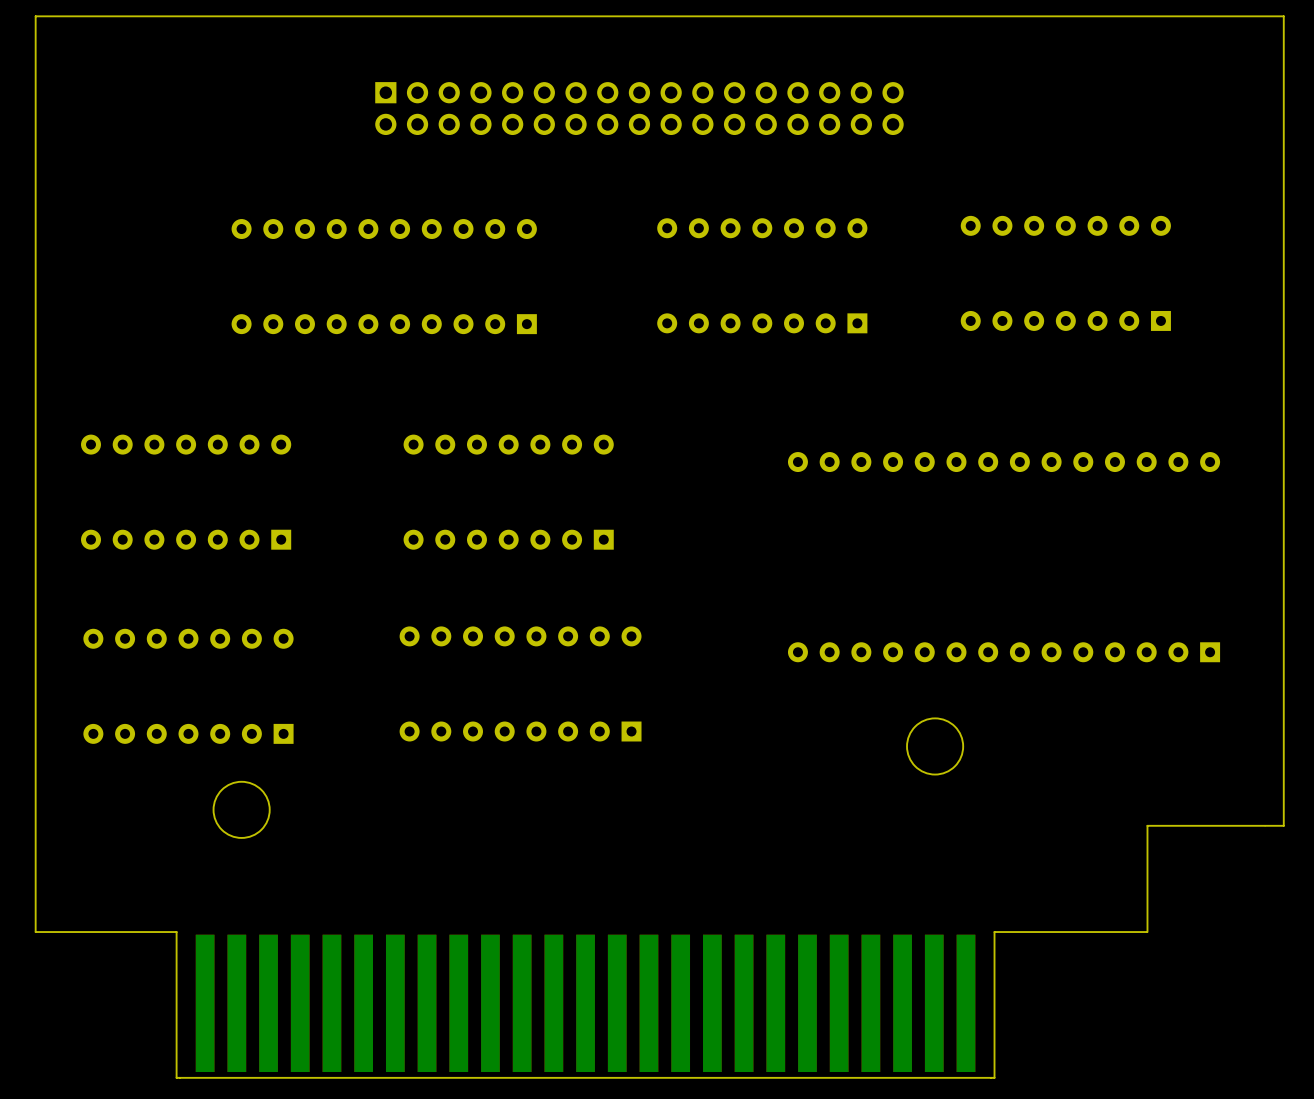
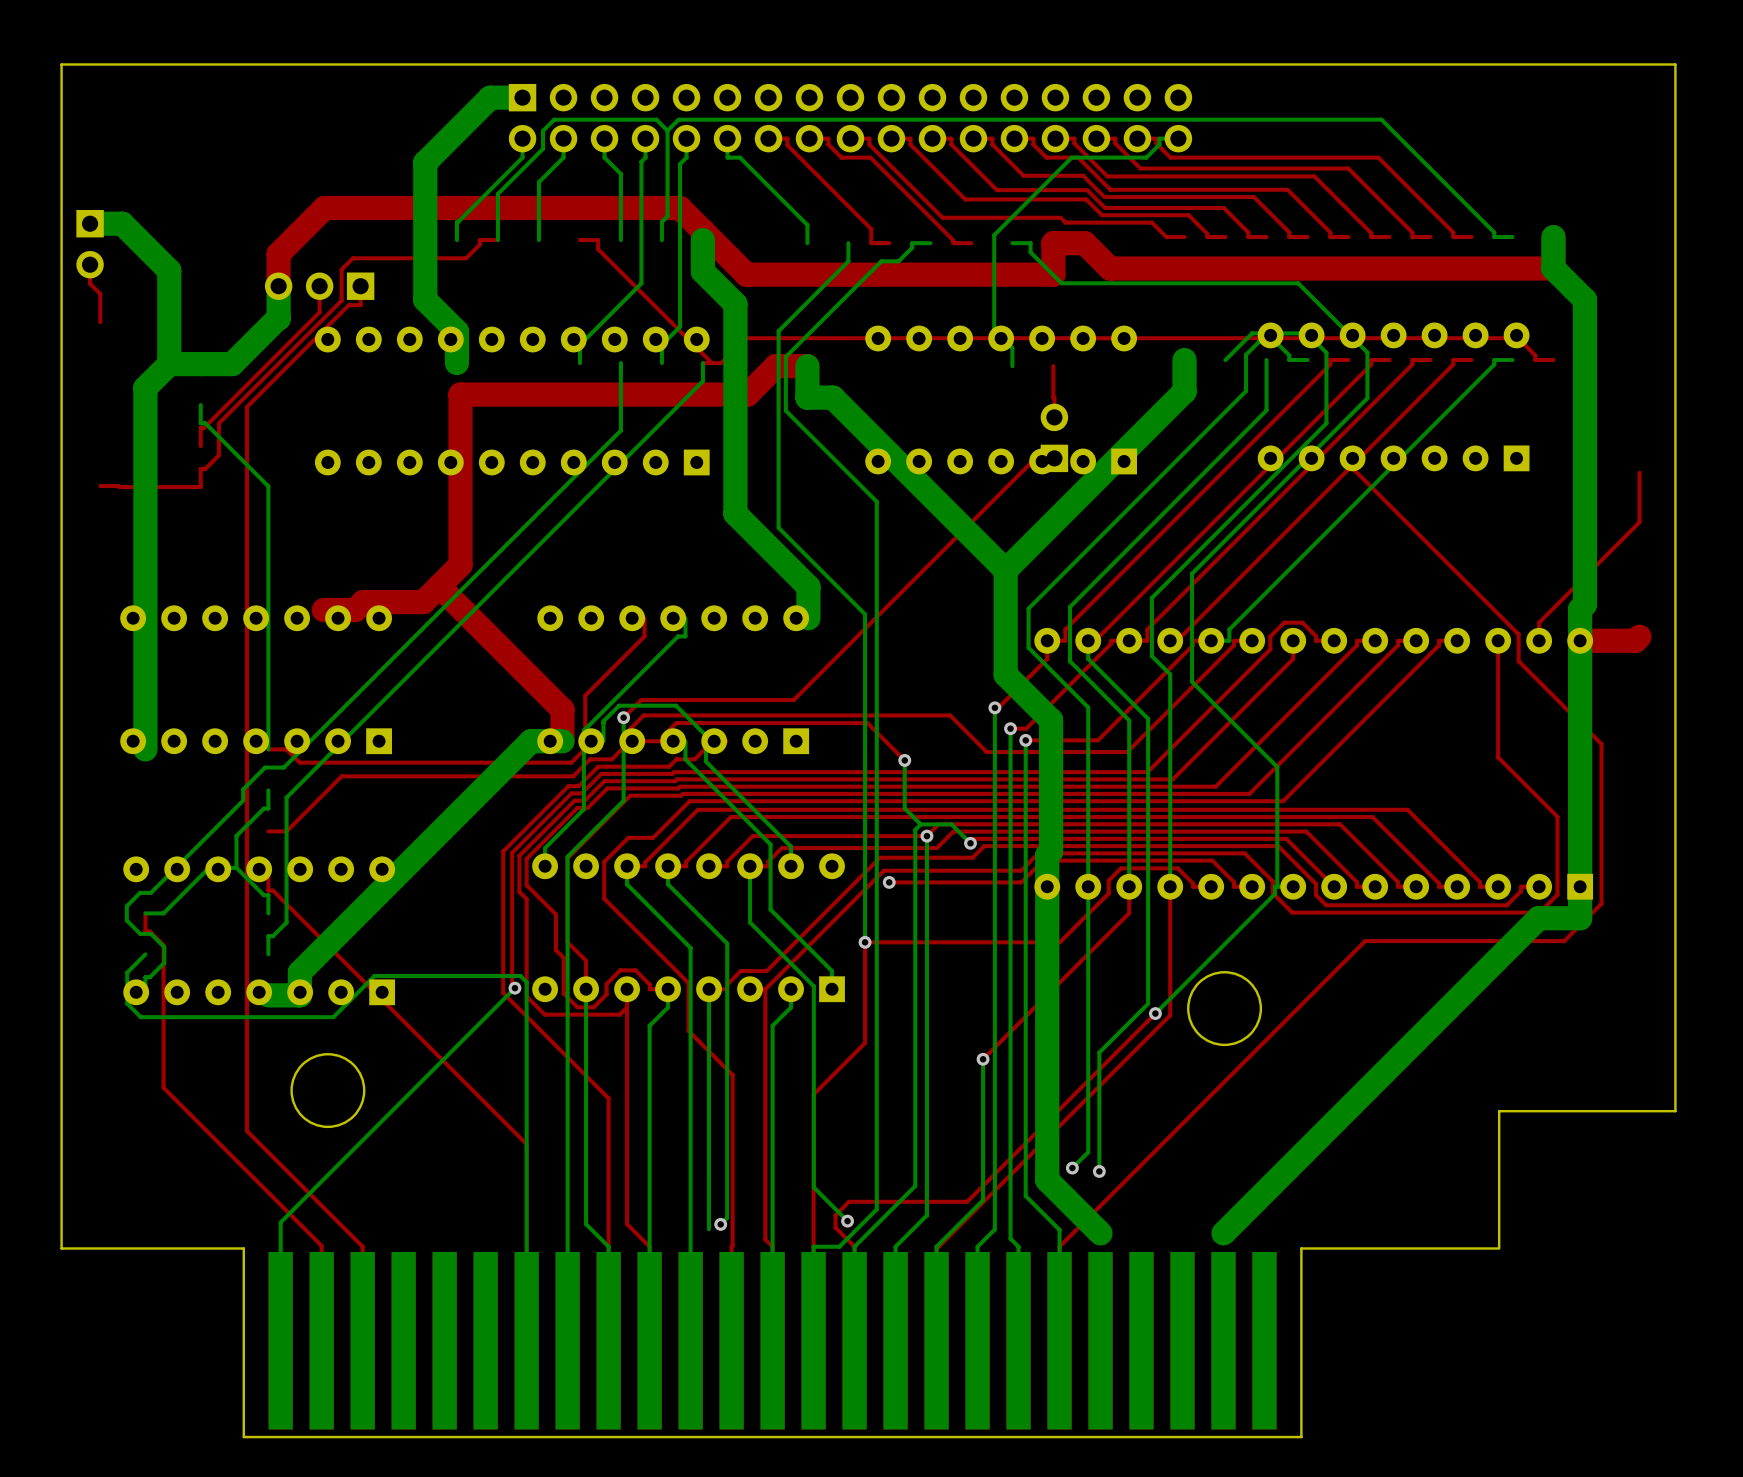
bottom track: none -> (522, 97) (490, 97) (425, 162) (425, 299) (456, 331) (456, 363)
bottom track: none -> (667, 130) (667, 216) (661, 221) (661, 240)
bottom track: none -> (667, 130) (678, 119) (1381, 119) (1494, 232) (1494, 237) (1512, 237)
bottom track: none -> (667, 130) (656, 119) (554, 119) (543, 130) (543, 148) (497, 193) (497, 240)
bottom track: none -> (522, 138) (522, 157) (456, 221) (456, 240)
bottom track: none -> (563, 138) (563, 157) (538, 182) (538, 240)
bottom track: none -> (604, 138) (604, 157) (620, 174) (620, 240)
bottom track: none -> (645, 138) (645, 157) (641, 161) (641, 283) (579, 344) (579, 363)
bottom track: none -> (686, 138) (686, 157) (680, 164) (680, 326) (661, 344) (661, 363)
bottom track: none -> (727, 138) (727, 157) (740, 157) (807, 225) (807, 243)
top track: none -> (768, 138) (787, 138) (787, 145) (871, 229) (871, 243) (889, 243)
top track: none -> (809, 138) (828, 138) (828, 144) (841, 157) (870, 157) (953, 240) (953, 243) (971, 243)
top track: none -> (850, 138) (869, 138) (869, 144) (942, 217) (1060, 217) (1065, 222) (1151, 222) (1166, 237) (1184, 237)
top track: none -> (891, 138) (910, 138) (910, 144) (965, 199) (1086, 199) (1102, 215) (1188, 215) (1207, 233) (1207, 237) (1225, 237)
top track: none -> (932, 138) (951, 138) (951, 144) (997, 190) (1087, 190) (1105, 207) (1223, 207) (1248, 232) (1248, 237) (1266, 237)
top track: none -> (973, 138) (992, 138) (992, 144) (1023, 175) (1083, 175) (1104, 197) (1253, 197) (1289, 232) (1289, 237) (1307, 237)
top track: none -> (1014, 138) (1033, 138) (1033, 144) (1046, 157) (1078, 157) (1110, 189) (1287, 189) (1330, 232) (1330, 237) (1348, 237)
top track: none -> (1055, 138) (1074, 138) (1074, 143) (1107, 176) (1314, 176) (1371, 233) (1371, 237) (1389, 237)
top track: none -> (1096, 138) (1115, 138) (1115, 143) (1140, 168) (1348, 168) (1412, 232) (1412, 237) (1430, 237)
top track: none -> (1137, 138) (1156, 138) (1156, 143) (1170, 157) (1378, 157) (1453, 232) (1453, 237) (1471, 237)
bottom track: none -> (1178, 138) (1159, 138) (1159, 144) (1146, 157) (1071, 157) (994, 235) (994, 329) (1012, 347) (1012, 366)
part position: (639, 108) -> (850, 118)
bottom track: none -> (90, 223) (122, 223) (169, 270) (169, 364)
bottom track: none -> (1553, 237) (1553, 268) (1584, 299) (1584, 604) (1580, 609) (1580, 918) (1538, 918) (1223, 1233)
top track: none -> (1553, 237) (1553, 268) (1110, 268) (1084, 243) (1053, 243) (1053, 274) (746, 274) (679, 208) (324, 208) (278, 253) (278, 286)
top track: none -> (497, 240) (479, 240) (479, 244) (466, 258) (352, 258) (341, 269) (341, 300) (218, 423) (218, 455) (205, 468) (200, 468) (200, 487) (100, 486)
top track: none -> (579, 240) (598, 240) (598, 249) (711, 363)
bottom track: none -> (702, 240) (702, 271) (735, 304) (735, 513) (808, 586) (808, 618)
bottom track: none -> (848, 243) (848, 261) (778, 331) (778, 527) (865, 614) (865, 942)
bottom track: none -> (930, 243) (912, 243) (912, 247) (898, 261) (881, 261) (785, 356) (785, 410) (876, 501) (876, 1209) (839, 1246) (813, 1246) (813, 1340)
bottom track: none -> (1012, 243) (1030, 243) (1030, 252) (1061, 283) (1298, 283) (1367, 352) (1367, 398) (1192, 573) (1192, 681) (1277, 767) (1277, 886)
part: none -> (90, 244)
top track: none -> (90, 264) (90, 283) (100, 293) (100, 322)
bottom track: none -> (278, 286) (278, 318) (232, 364) (169, 364)
top track: none -> (319, 286) (319, 312) (204, 427) (200, 427) (200, 446)
part: none -> (319, 286)
top track: none -> (360, 286) (360, 305) (348, 305) (246, 406) (246, 1131) (362, 1246) (362, 1340)
bottom track: none -> (1184, 360) (1184, 391) (1005, 570)
bottom track: none -> (1225, 360) (1252, 333) (1307, 333) (1326, 352) (1326, 423) (1151, 597) (1151, 656) (1170, 674) (1170, 886)
bottom track: none -> (1266, 360) (1266, 410) (1070, 606) (1070, 661) (1129, 720) (1129, 886)
bottom track: none -> (1307, 360) (1289, 360) (1289, 355) (1275, 341) (1259, 341) (1246, 354) (1246, 391) (1028, 608) (1028, 647) (1088, 707) (1088, 1152) (1072, 1168)
top track: none -> (1348, 360) (1330, 360) (1330, 364) (1065, 629) (1065, 640) (1047, 640) (1047, 658) (998, 707) (994, 707)
top track: none -> (1389, 360) (1371, 360) (1371, 364) (1095, 640) (1088, 640)
top track: none -> (1430, 360) (1412, 360) (1412, 364) (1147, 629) (1147, 640) (1111, 640) (1111, 643) (1026, 728) (1010, 728)
top track: none -> (1471, 360) (1453, 360) (1453, 364) (1351, 466)
bottom track: none -> (1512, 360) (1494, 360) (1494, 364) (1229, 629) (1229, 640) (1211, 640)
top track: none -> (1553, 360) (1535, 360) (1535, 355) (1518, 338) (745, 338) (721, 363) (702, 363)
bottom track: none -> (620, 363) (620, 430) (283, 767) (265, 767) (243, 789) (243, 800) (150, 892) (140, 892) (126, 906) (126, 920) (140, 933) (151, 933) (164, 947) (164, 962) (149, 977) (145, 977) (145, 995)
bottom track: none -> (702, 363) (702, 381) (286, 797) (286, 922) (272, 936) (268, 936) (268, 954)
bottom track: none -> (169, 364) (145, 387) (145, 749)
bottom track: none -> (807, 366) (807, 397) (832, 397) (1005, 570)
top track: none -> (807, 366) (775, 366) (747, 394) (460, 394) (460, 565) (439, 586)
top track: none -> (1053, 366) (1054, 417)
bottom track: none -> (200, 405) (200, 423) (205, 423) (268, 486) (268, 749)
part: none -> (1054, 437)
top track: none -> (1054, 458) (1035, 458) (793, 700) (641, 700) (623, 717)
top track: none -> (1351, 466) (1177, 640) (1170, 640)
top track: none -> (1351, 466) (1518, 634) (1518, 661) (1601, 744) (1601, 903) (1564, 941) (1365, 941) (1059, 1246) (1059, 1340)
top track: none -> (1639, 472) (1639, 522) (1539, 622) (1539, 640)
bottom track: none -> (1005, 570) (1005, 674) (1051, 720) (1051, 851) (1047, 855) (1047, 1180) (1100, 1233)
top track: none -> (439, 586) (423, 602) (363, 602) (355, 610) (323, 610)
top track: none -> (439, 586) (562, 709) (562, 741)
top track: none -> (644, 618) (644, 636) (585, 695) (585, 748) (571, 762) (299, 762) (286, 749) (268, 749)
bottom track: none -> (685, 618) (685, 636) (678, 636) (583, 730) (583, 809) (545, 848) (545, 866)
top track: none -> (1639, 636) (1635, 640) (1580, 640)
bottom track: none -> (1088, 640) (1088, 658) (1148, 718) (1148, 1003) (1099, 1052) (1099, 1171)
top track: none -> (1211, 640) (1193, 640) (1193, 645) (1098, 740) (1025, 740)
top track: none -> (1252, 640) (1234, 640) (1234, 645) (1127, 752) (986, 752) (950, 715) (643, 715) (624, 735) (624, 747) (611, 759) (590, 759) (573, 776) (341, 776) (286, 831) (268, 831)
top track: none -> (1293, 640) (1293, 658) (1172, 779) (677, 779) (675, 781) (604, 781) (584, 800) (574, 800) (519, 855) (519, 891) (526, 899) (526, 996) (544, 1014) (619, 1014) (627, 1007)
top track: none -> (1334, 640) (1316, 640) (1316, 636) (1302, 622) (1284, 622) (1270, 636) (1270, 649) (1147, 772) (674, 772) (672, 773) (601, 773) (581, 793) (571, 793) (512, 852) (512, 985) (514, 988)
top track: none -> (1375, 640) (1357, 640) (1357, 645) (1215, 786) (680, 786) (678, 788) (607, 788) (587, 807) (577, 807) (526, 858) (526, 885) (555, 914) (555, 950) (563, 957) (563, 993) (577, 1007) (593, 1007) (606, 994) (606, 984) (620, 970) (635, 970) (649, 984) (649, 989) (668, 989)
top track: none -> (1416, 640) (1398, 640) (1398, 645) (1249, 793) (683, 793) (681, 795) (630, 795) (567, 858) (567, 941) (586, 960) (586, 989)
top track: none -> (1457, 640) (1439, 640) (1439, 645) (1283, 801) (689, 801) (653, 837) (628, 837) (604, 861) (604, 898) (688, 983) (688, 1030) (732, 1075) (731, 1340)
top track: none -> (1498, 640) (1498, 757) (1557, 816) (1557, 894) (1539, 912) (1292, 912) (1272, 893) (1272, 881) (1244, 853) (1038, 853) (1021, 870) (883, 870) (765, 989)
bottom track: none -> (994, 707) (994, 1229) (977, 1246) (977, 1340)
via: none -> (994, 707)
bottom track: none -> (623, 717) (623, 800) (567, 856) (567, 1340)
via: none -> (623, 717)
bottom track: none -> (1010, 728) (1010, 1238) (1018, 1246) (1018, 1340)
via: none -> (1010, 728)
bottom track: none -> (562, 741) (531, 741) (299, 972) (299, 995) (268, 995)
bottom track: none -> (603, 741) (603, 721) (619, 705) (676, 705) (705, 735) (705, 761) (791, 846) (791, 866)
top track: none -> (644, 741) (662, 741) (662, 736) (676, 723) (867, 723) (904, 760)
bottom track: none -> (685, 741) (685, 759) (770, 844) (770, 909) (832, 971) (832, 989)
top track: none -> (726, 741) (708, 741) (708, 745) (694, 759) (676, 759) (669, 766) (598, 766) (578, 786) (568, 786) (503, 851) (503, 992) (608, 1098) (608, 1340)
bottom track: none -> (1025, 740) (1025, 1196) (1059, 1229) (1059, 1340)
via: none -> (1025, 740)
bottom track: none -> (904, 760) (904, 808) (920, 824)
via: none -> (904, 760)
bottom track: none -> (268, 790) (268, 808) (263, 808) (236, 835) (236, 867)
bottom track: none -> (920, 824) (951, 824) (970, 843)
bottom track: none -> (920, 824) (915, 829) (915, 1186) (854, 1246) (854, 1340)
bottom track: none -> (926, 836) (926, 1215) (895, 1246) (895, 1340)
via: none -> (926, 836)
top track: none -> (970, 843) (974, 838) (1286, 838) (1334, 886)
via: none -> (970, 843)
bottom track: none -> (627, 866) (627, 884) (690, 947) (690, 1340)
top track: none -> (627, 866) (645, 866) (645, 862) (697, 809) (1407, 809) (1479, 882) (1479, 886) (1498, 886)
bottom track: none -> (668, 866) (668, 884) (727, 943) (727, 1217) (720, 1224)
top track: none -> (668, 866) (686, 866) (686, 861) (730, 817) (1372, 817) (1439, 883) (1439, 886) (1457, 886)
top track: none -> (709, 866) (727, 866) (727, 861) (752, 836) (926, 836) (938, 824) (1340, 824) (1398, 882) (1398, 886) (1416, 886)
bottom track: none -> (750, 866) (750, 922) (813, 986) (813, 1187) (847, 1221)
top track: none -> (750, 866) (768, 866) (768, 861) (781, 848) (936, 848) (953, 831) (1306, 831) (1357, 882) (1357, 886) (1375, 886)
bottom track: none -> (236, 867) (263, 895) (268, 895) (268, 913)
bottom track: none -> (236, 867) (209, 867) (163, 913) (145, 913)
top track: none -> (268, 872) (268, 890) (272, 890) (526, 1144) (526, 1340)
top track: none -> (889, 882) (1021, 882) (1043, 860) (1212, 860) (1234, 882) (1234, 886) (1252, 886)
via: none -> (889, 882)
top track: none -> (1129, 886) (1129, 913) (983, 1059)
top track: none -> (1170, 886) (1170, 1015) (938, 1246) (936, 1246) (936, 1340)
top track: none -> (1211, 886) (1193, 886) (1193, 883) (1177, 868) (1121, 868) (1108, 880) (1108, 893) (1059, 942) (865, 942) (865, 1043) (813, 1094) (813, 1340)
bottom track: none -> (1293, 886) (1275, 886) (1275, 893) (1155, 1013)
top track: none -> (1539, 886) (1520, 886) (1520, 891) (1506, 905) (1326, 905) (1316, 895) (1316, 883) (1278, 846) (984, 846) (972, 857) (880, 857) (766, 971) (740, 971) (727, 984) (727, 989) (709, 989)
top track: none -> (145, 913) (145, 931) (149, 931) (163, 945) (163, 1087) (321, 1245) (321, 1340)
via: none -> (865, 942)
bottom track: none -> (145, 954) (127, 972) (127, 1003) (140, 1017) (333, 1017) (374, 976) (520, 976) (526, 982) (526, 1340)
bottom track: none -> (514, 988) (280, 1222) (280, 1340)
via: none -> (514, 988)
bottom track: none -> (586, 989) (586, 1224) (608, 1246) (608, 1340)
top track: none -> (627, 989) (627, 1224) (649, 1246) (649, 1340)
bottom track: none -> (668, 989) (668, 1007) (649, 1025) (649, 1340)
bottom track: none -> (709, 989) (708, 1229)
top track: none -> (765, 989) (765, 1239) (772, 1246) (772, 1340)
bottom track: none -> (791, 989) (791, 1007) (772, 1025) (772, 1340)
top track: none -> (1155, 1013) (967, 1201) (849, 1201) (835, 1215) (835, 1227) (854, 1246) (854, 1340)
via: none -> (1155, 1013)
bottom track: none -> (983, 1059) (983, 1200) (936, 1246) (936, 1340)
via: none -> (983, 1059)
via: none -> (1072, 1168)
via: none -> (1099, 1171)
via: none -> (847, 1221)
via: none -> (720, 1224)

